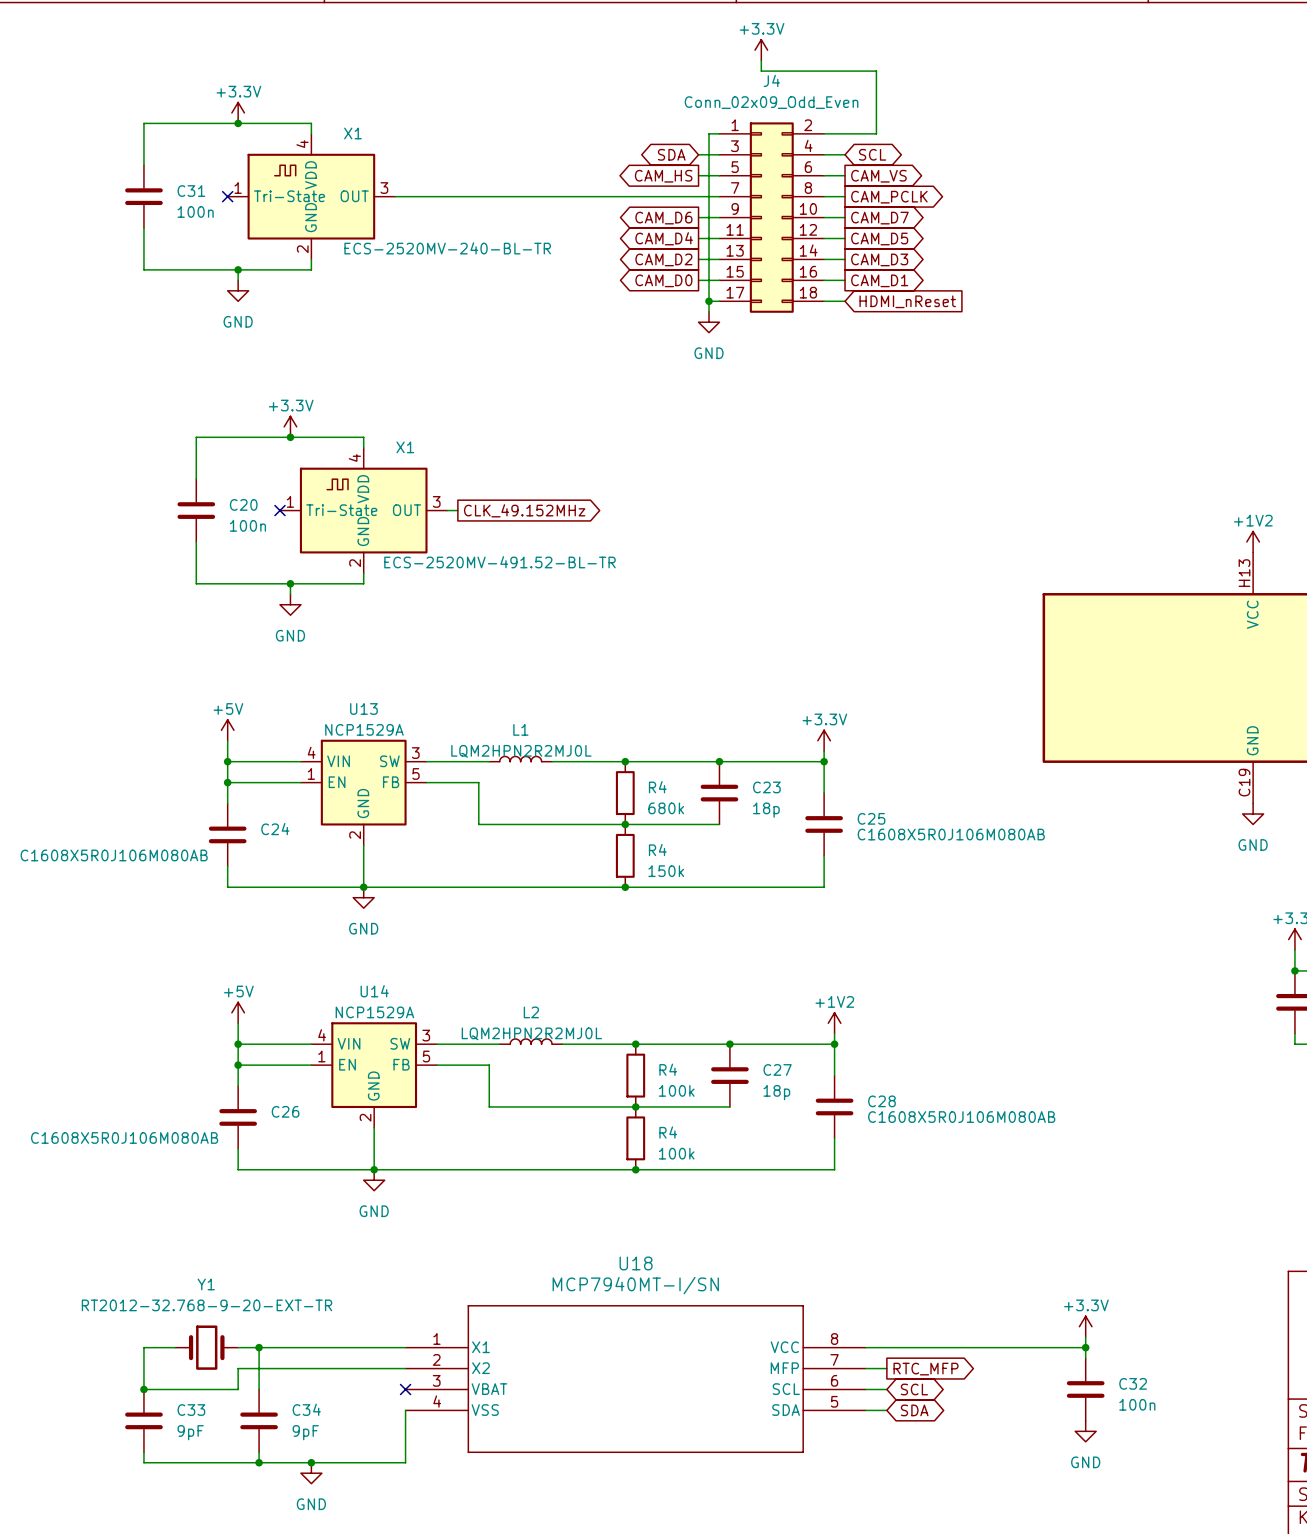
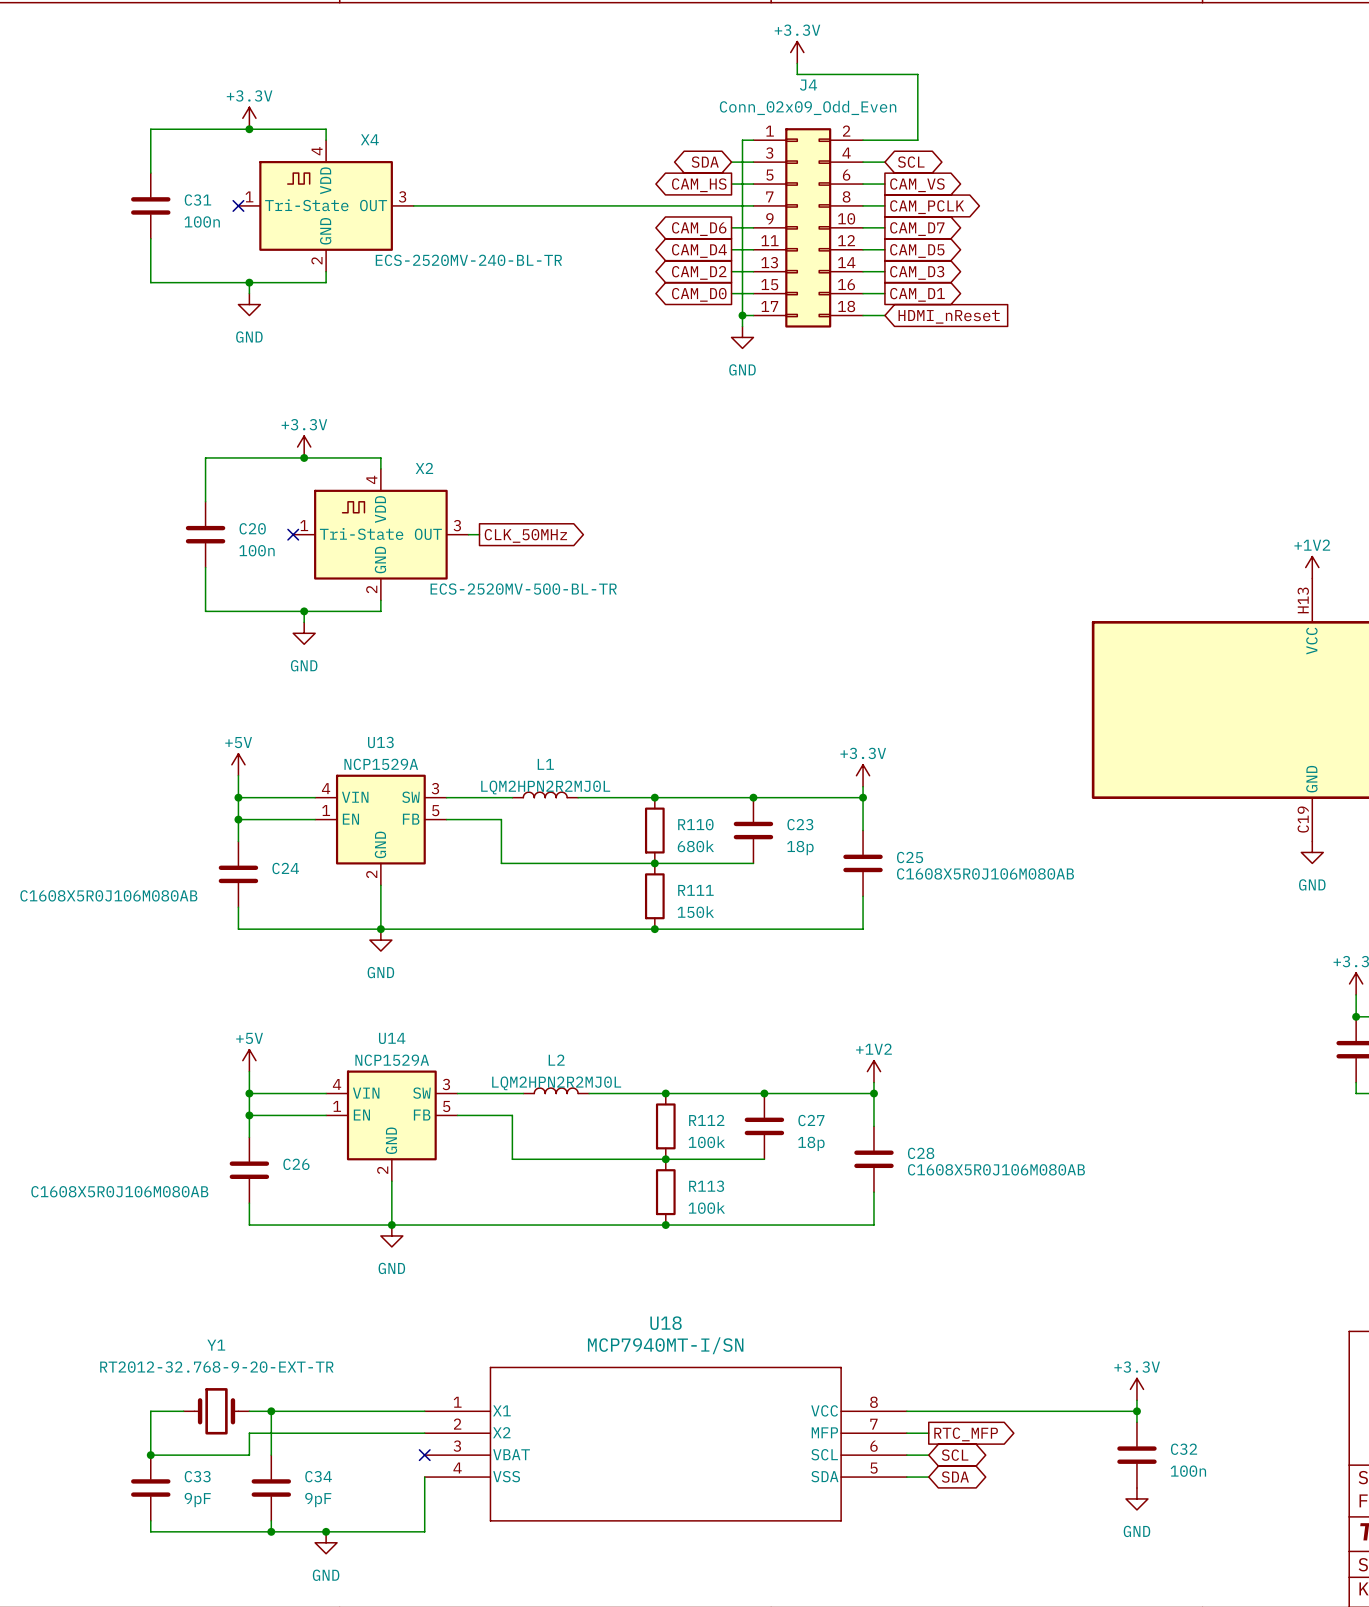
X1 name: X1 (352, 133) -> X4 (369, 139)
X1 name: X1 (405, 447) -> X2 (424, 468)
global label: CLK_49.152MHz (524, 510) -> CLK_50MHz (525, 535)
X1 value: ECS-2520MV-491.52-BL-TR (499, 562) -> ECS-2520MV-500-BL-TR (523, 589)
R4 name: R4 (657, 787) -> R110 (695, 824)
R4 name: R4 (657, 849) -> R111 (695, 890)
R4 name: R4 (668, 1069) -> R112 (706, 1120)
R4 name: R4 (668, 1132) -> R113 (706, 1186)

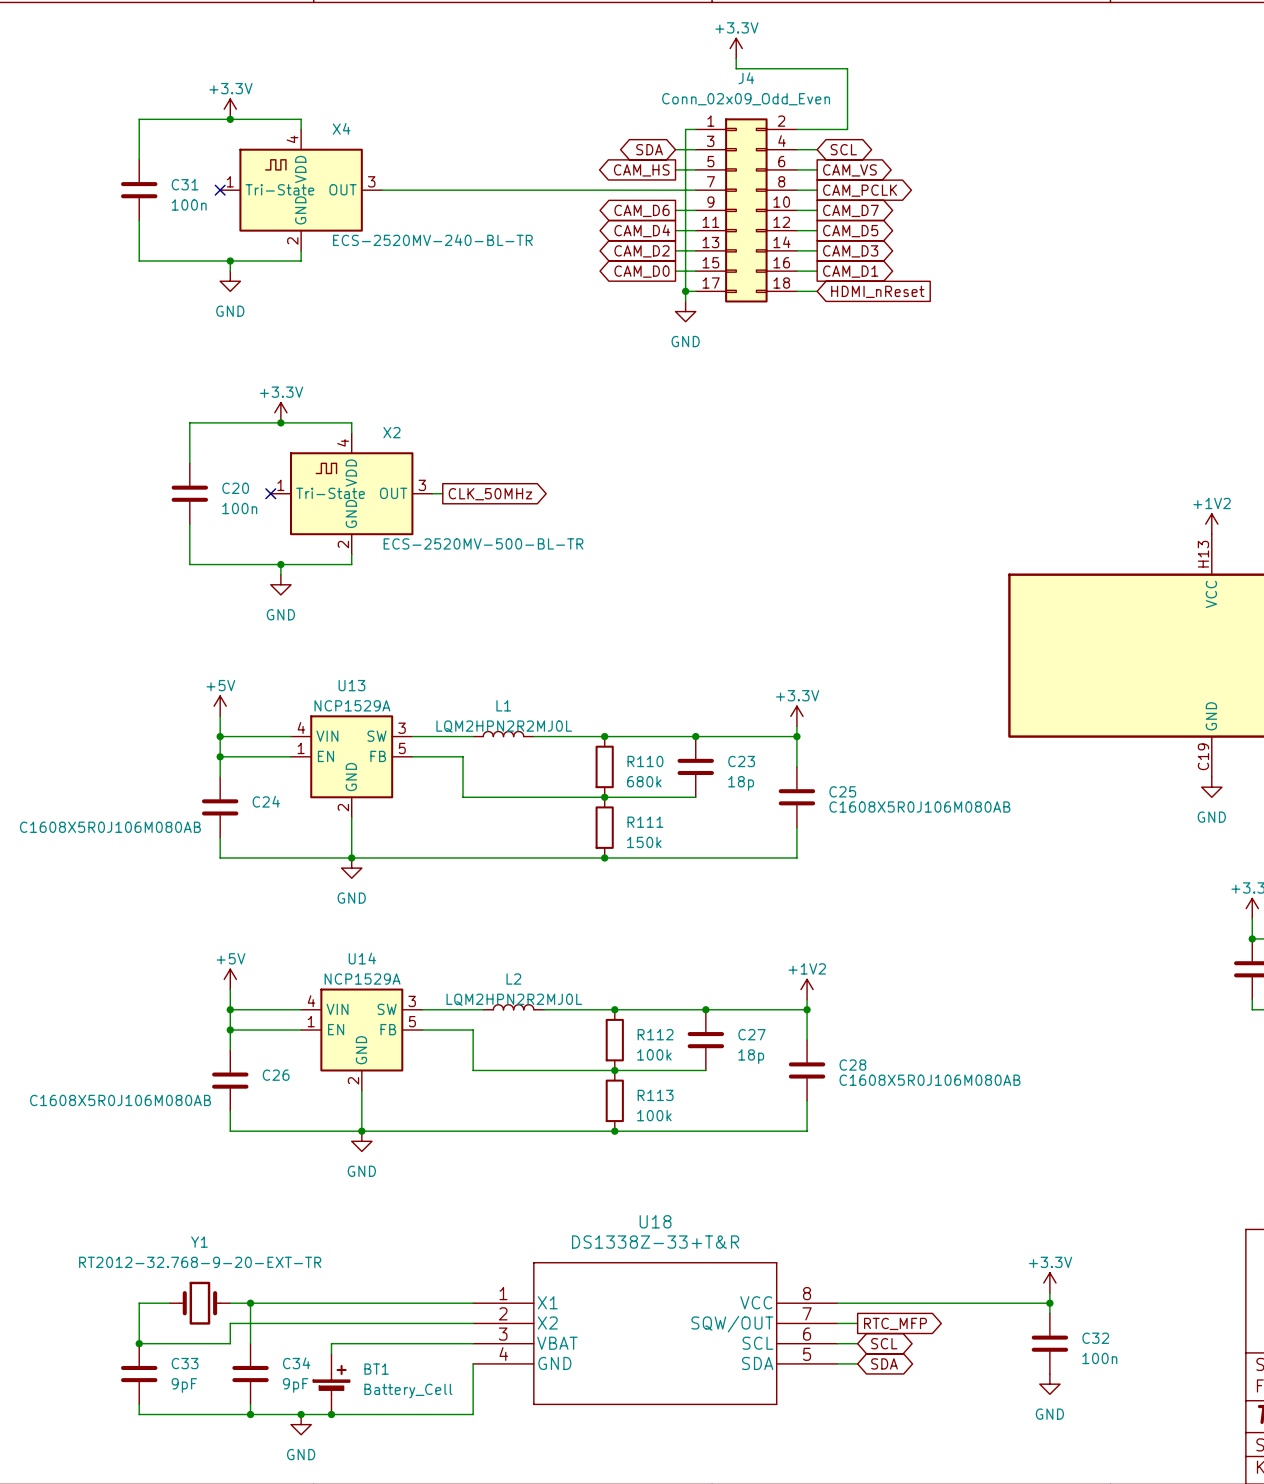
U18 value: MCP7940MT-I/SN (665, 1345) -> DS1338Z-33+T&R (655, 1242)
U18 symbol: [424, 1366, 907, 1522] -> [473, 1262, 838, 1405]
no-connect mark: (424, 1455) -> none
wire: none -> (473, 1343) (331, 1343) (331, 1353)
wire: (424, 1477) (424, 1531) -> (473, 1363) (473, 1414) (392, 1414)
BT1: none -> Battery_Cell (331, 1384)
junction: none -> (331, 1414)

